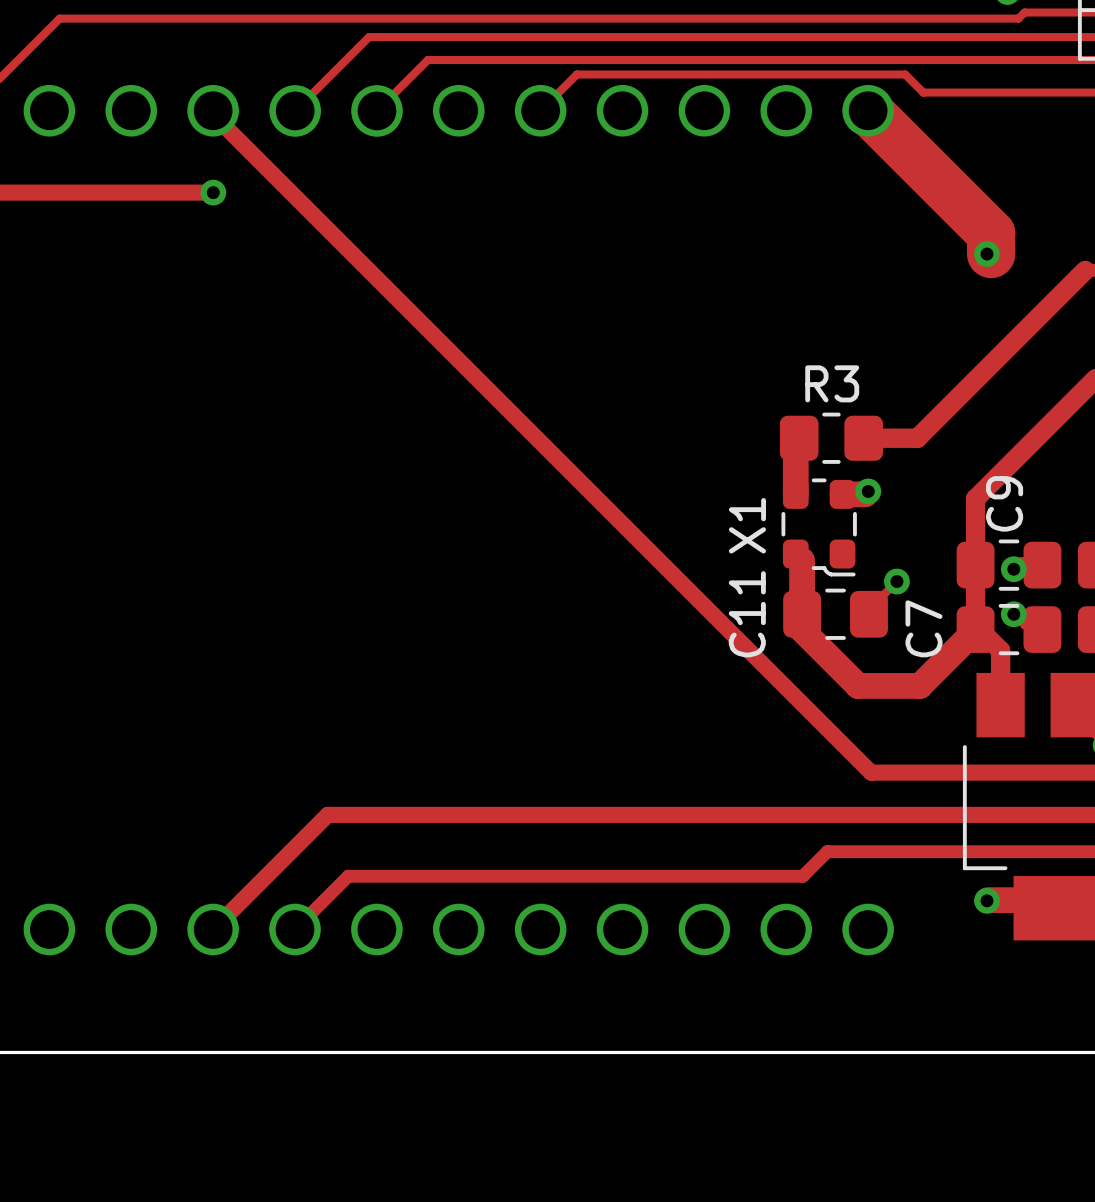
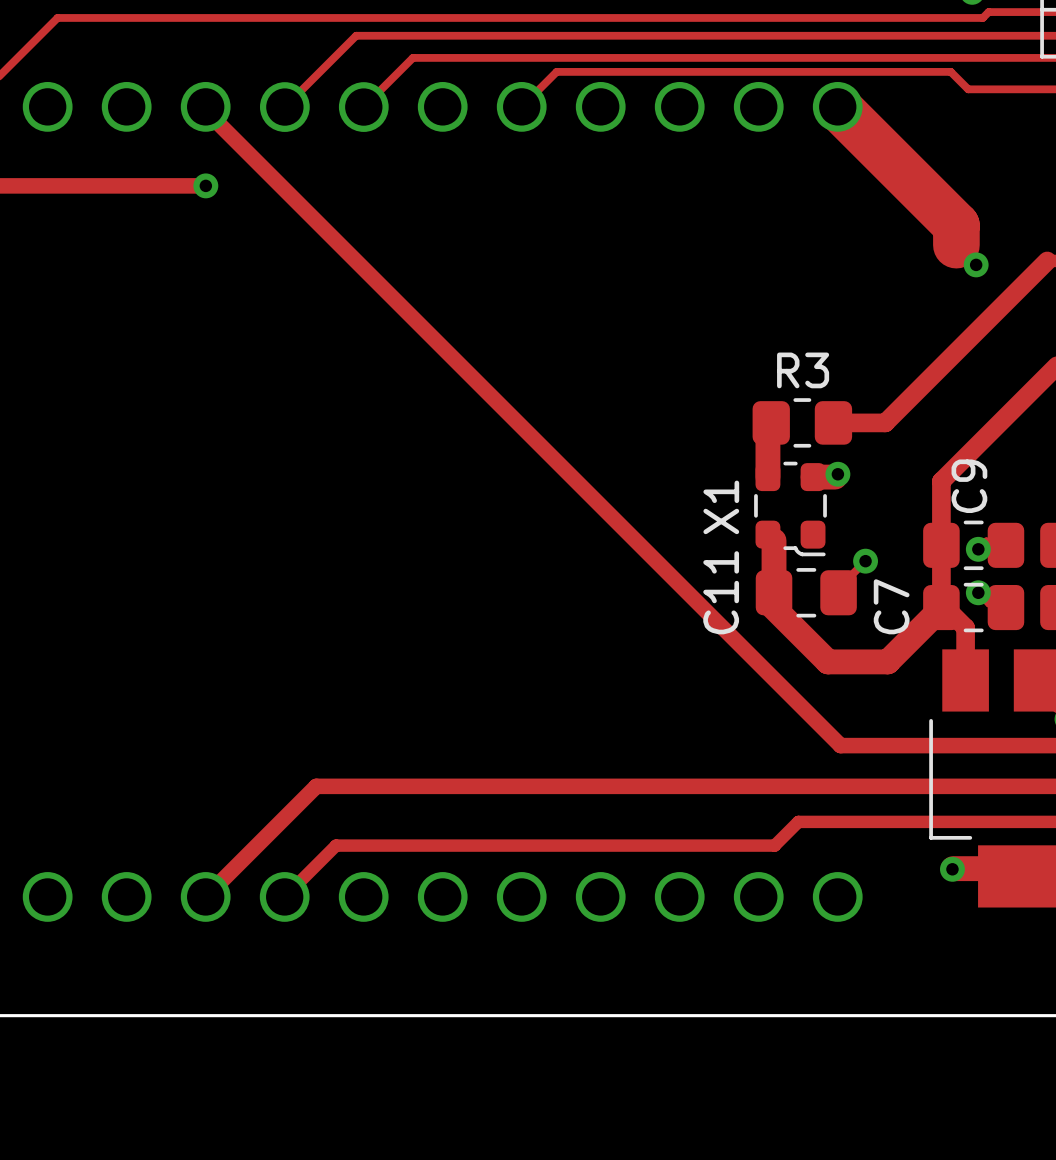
top track: (905, 74) (923, 92) (1003, 92) -> (873, 71) (950, 71) (968, 89)
via position: (987, 254) -> (976, 264)

